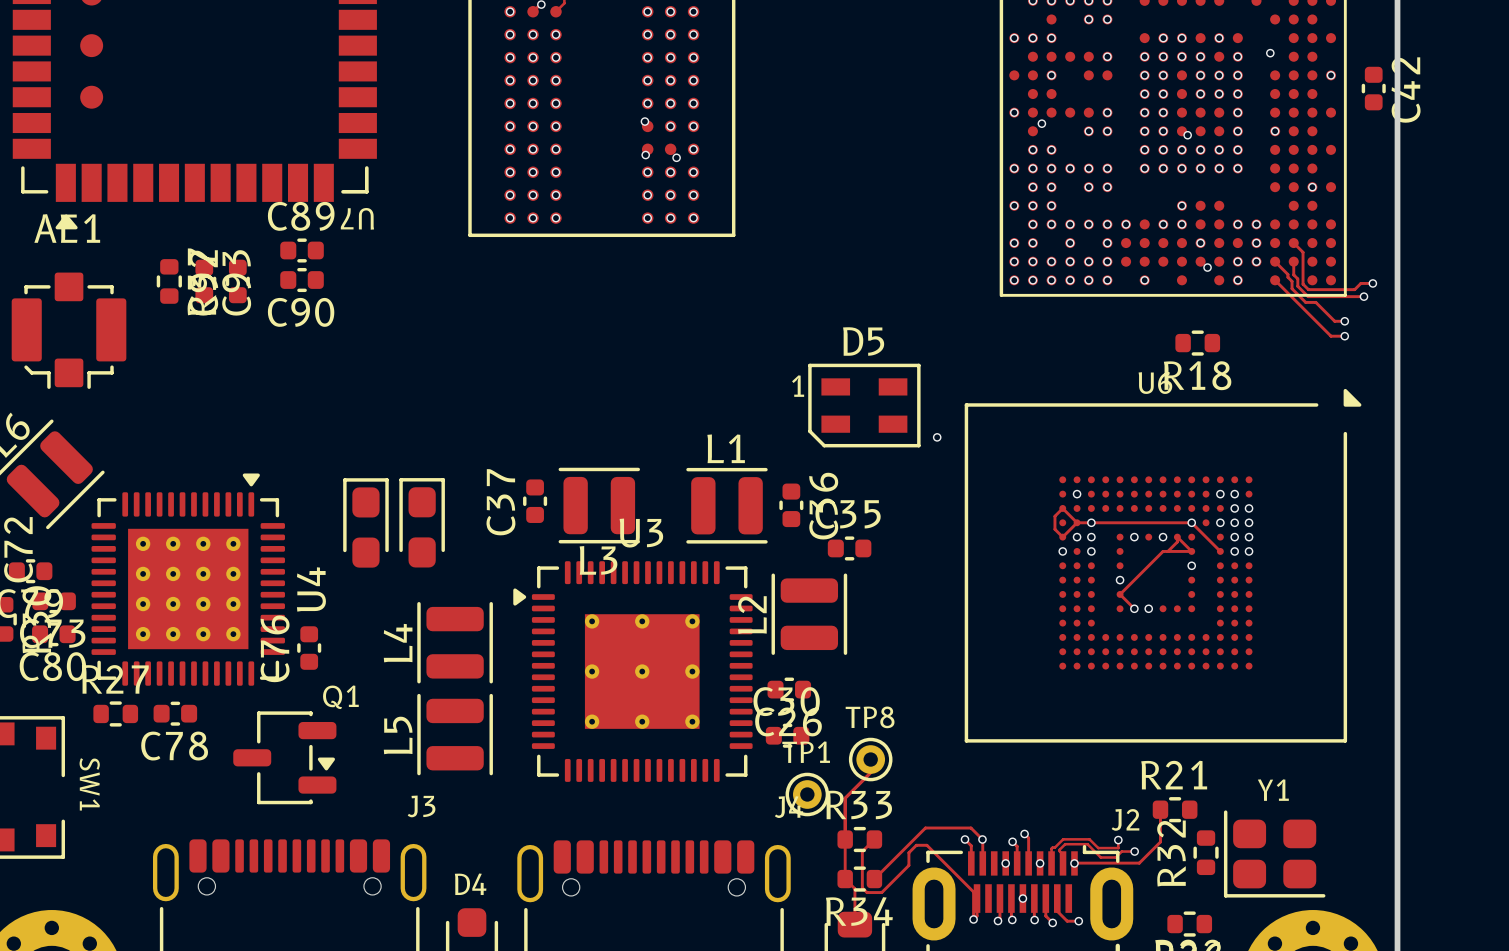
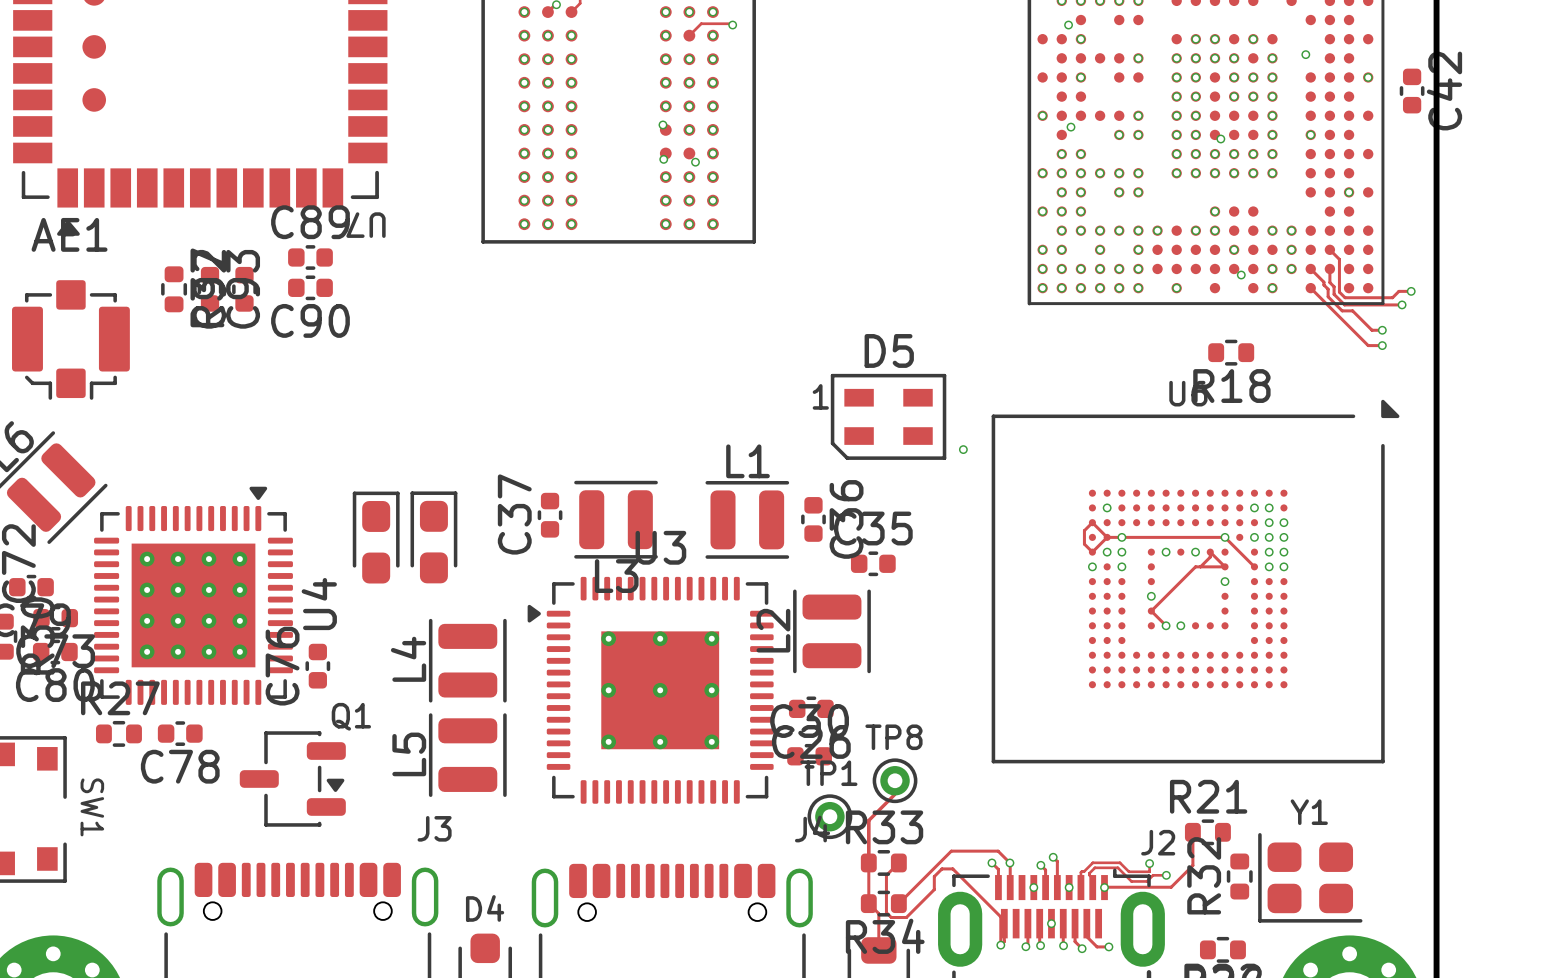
via: (1088, 19) -> none
via: (1107, 19) -> none
track: none -> (732, 25) (701, 23) (689, 35)
via: none -> (732, 25)
via: none -> (1068, 25)
via: (670, 34) -> none
via: (1014, 38) -> none
via: (1032, 38) -> none

